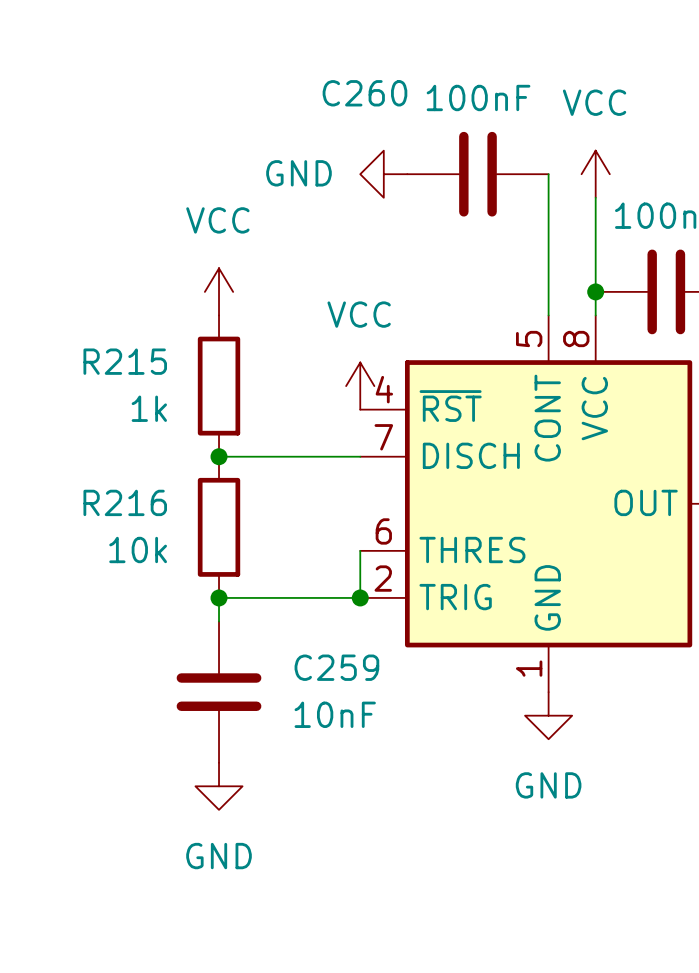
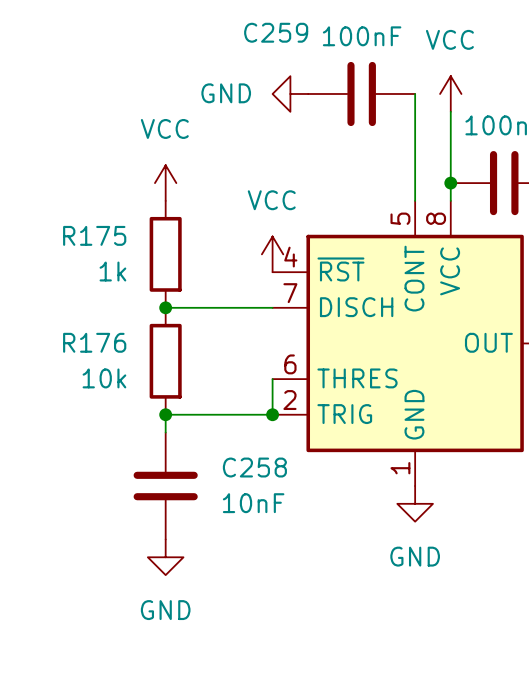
C260 name: C260 (364, 93) -> C259 (276, 32)
R215 name: R215 (125, 361) -> R175 (94, 235)
R216 name: R216 (125, 502) -> R176 (94, 342)
C259 name: C259 (336, 667) -> C258 (254, 467)

